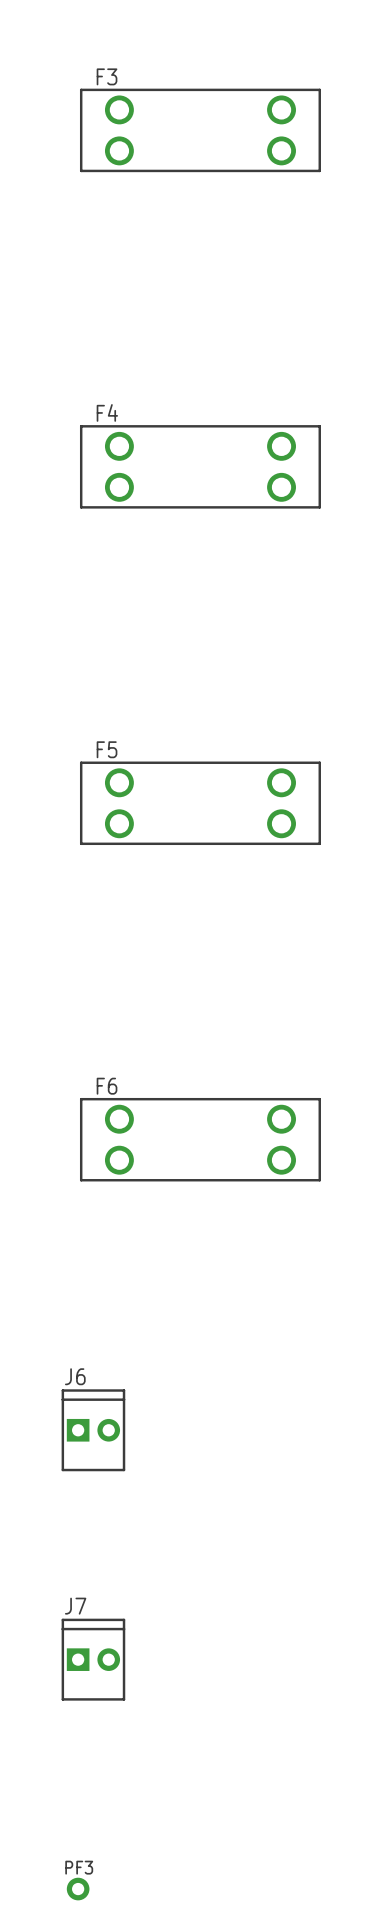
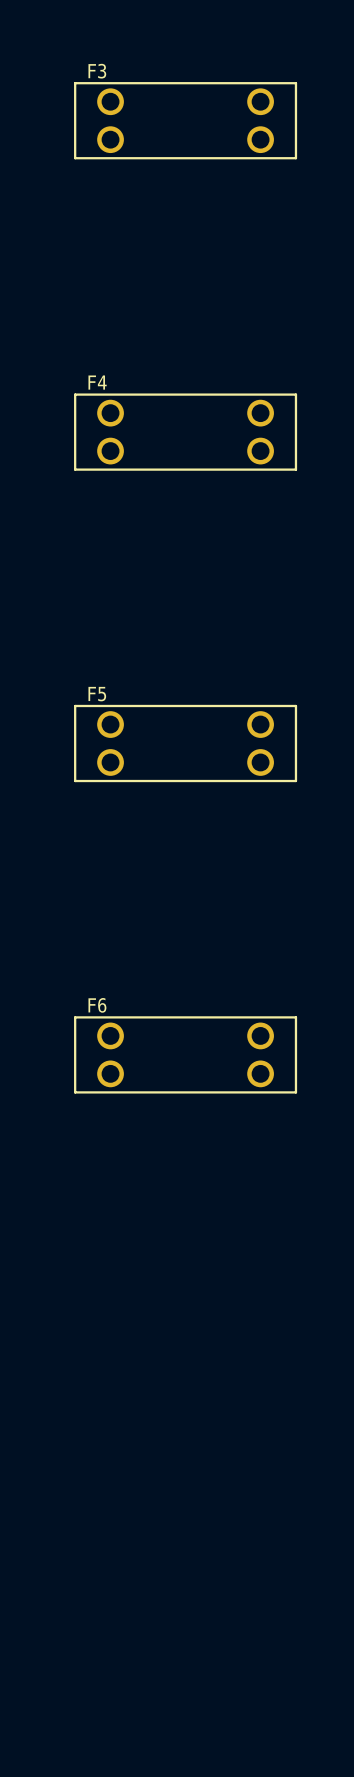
J6: (93, 1430) -> none
J7: (93, 1659) -> none
PF3: (78, 1889) -> none

